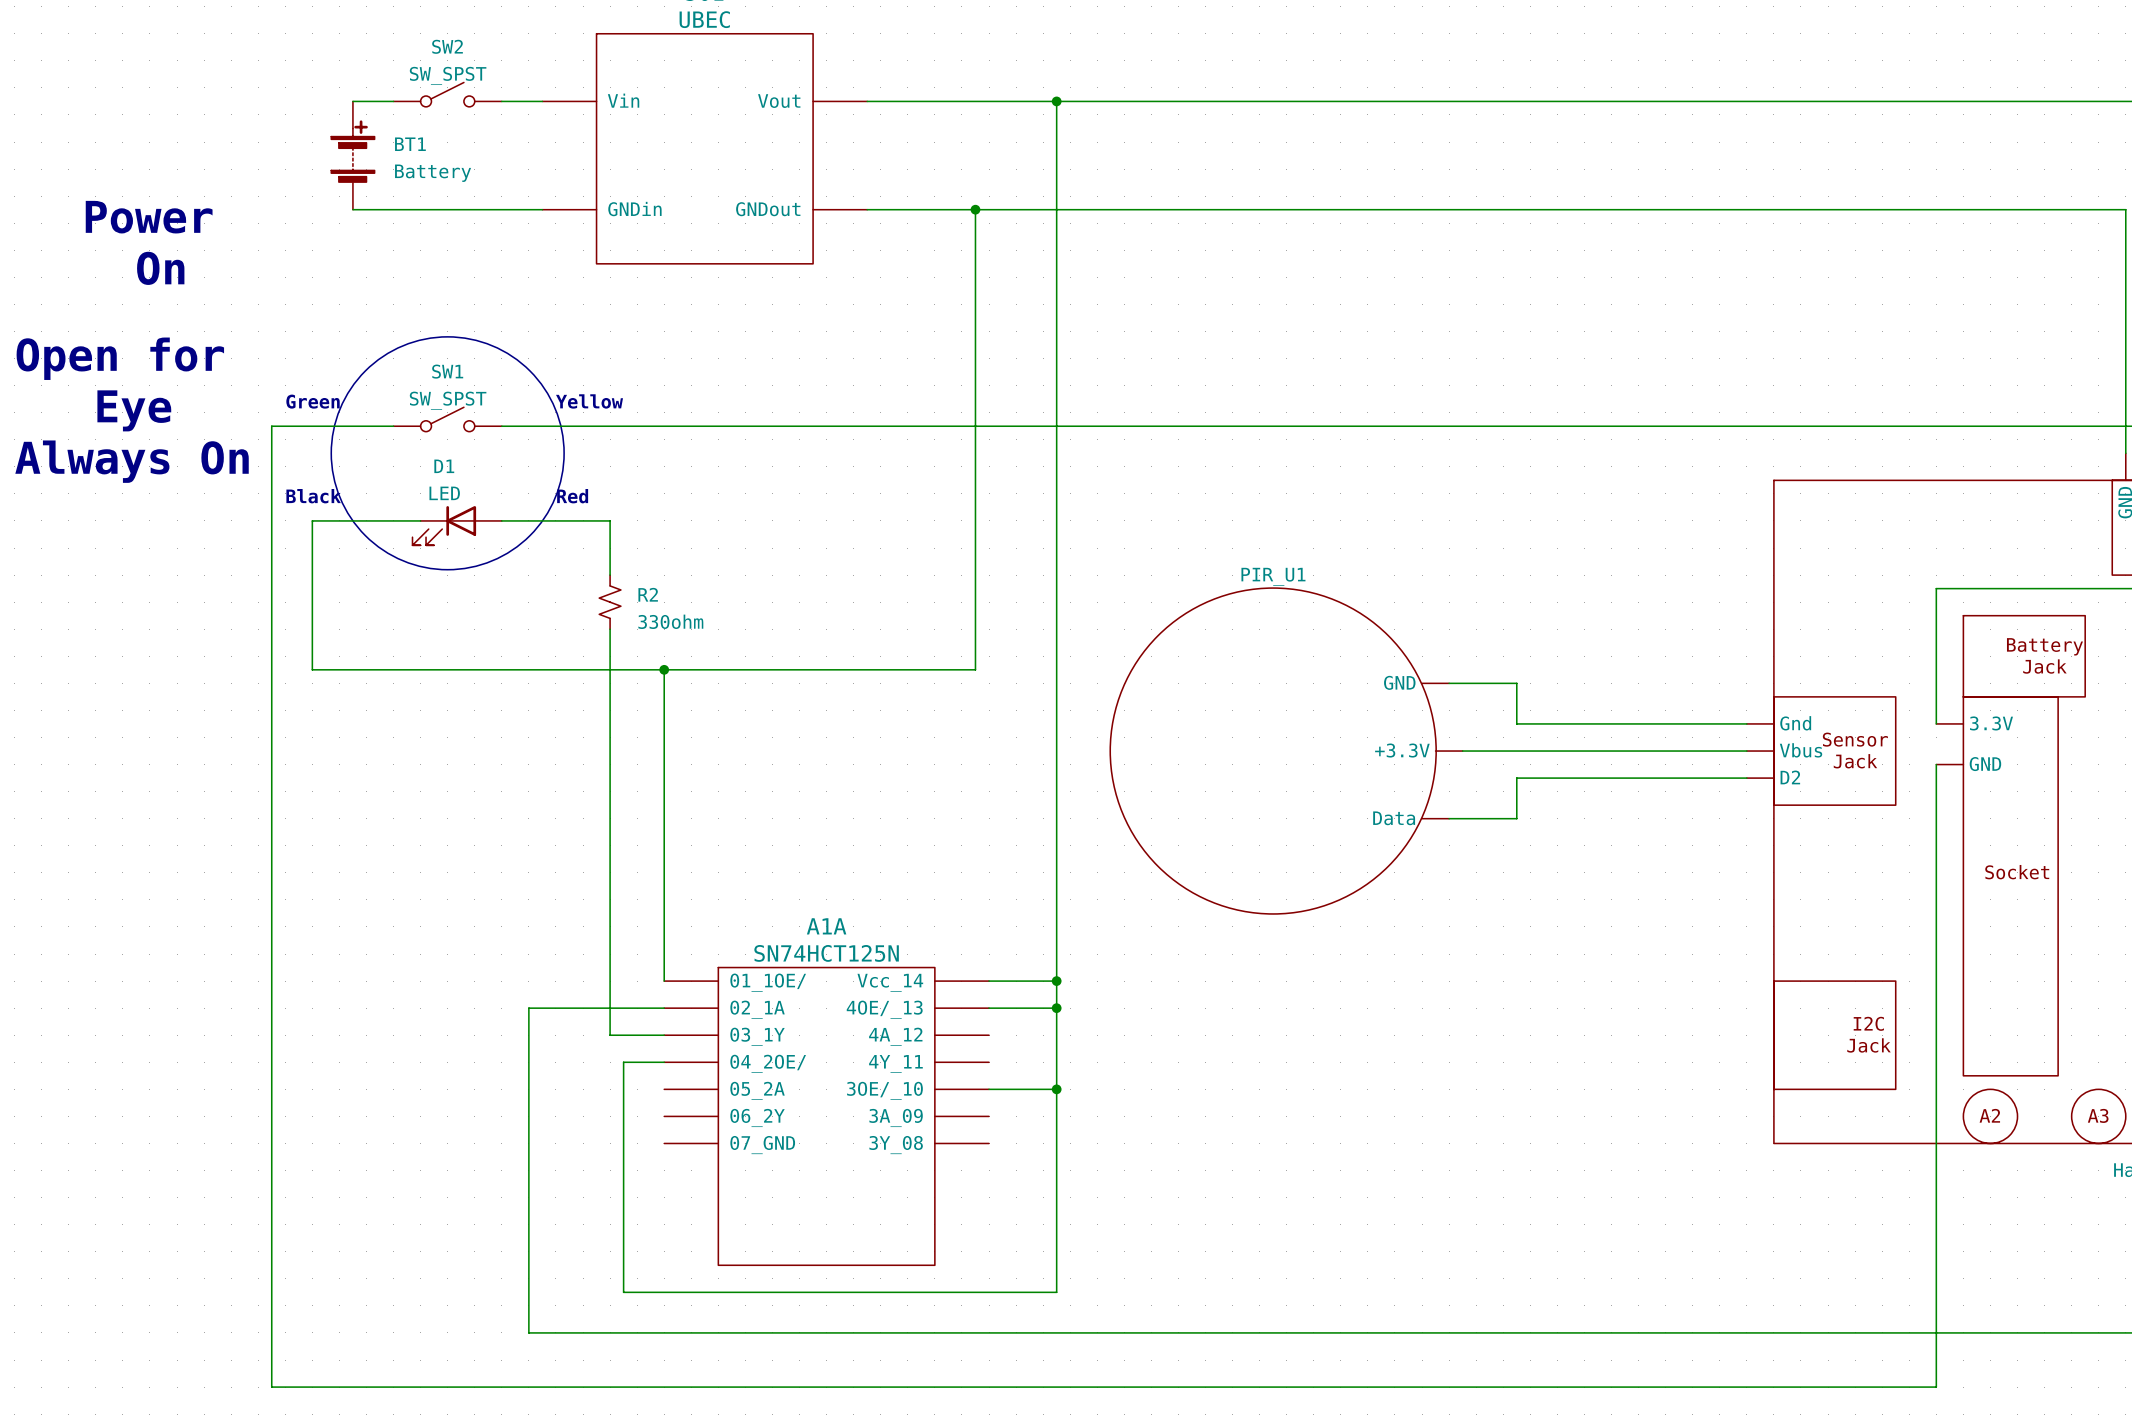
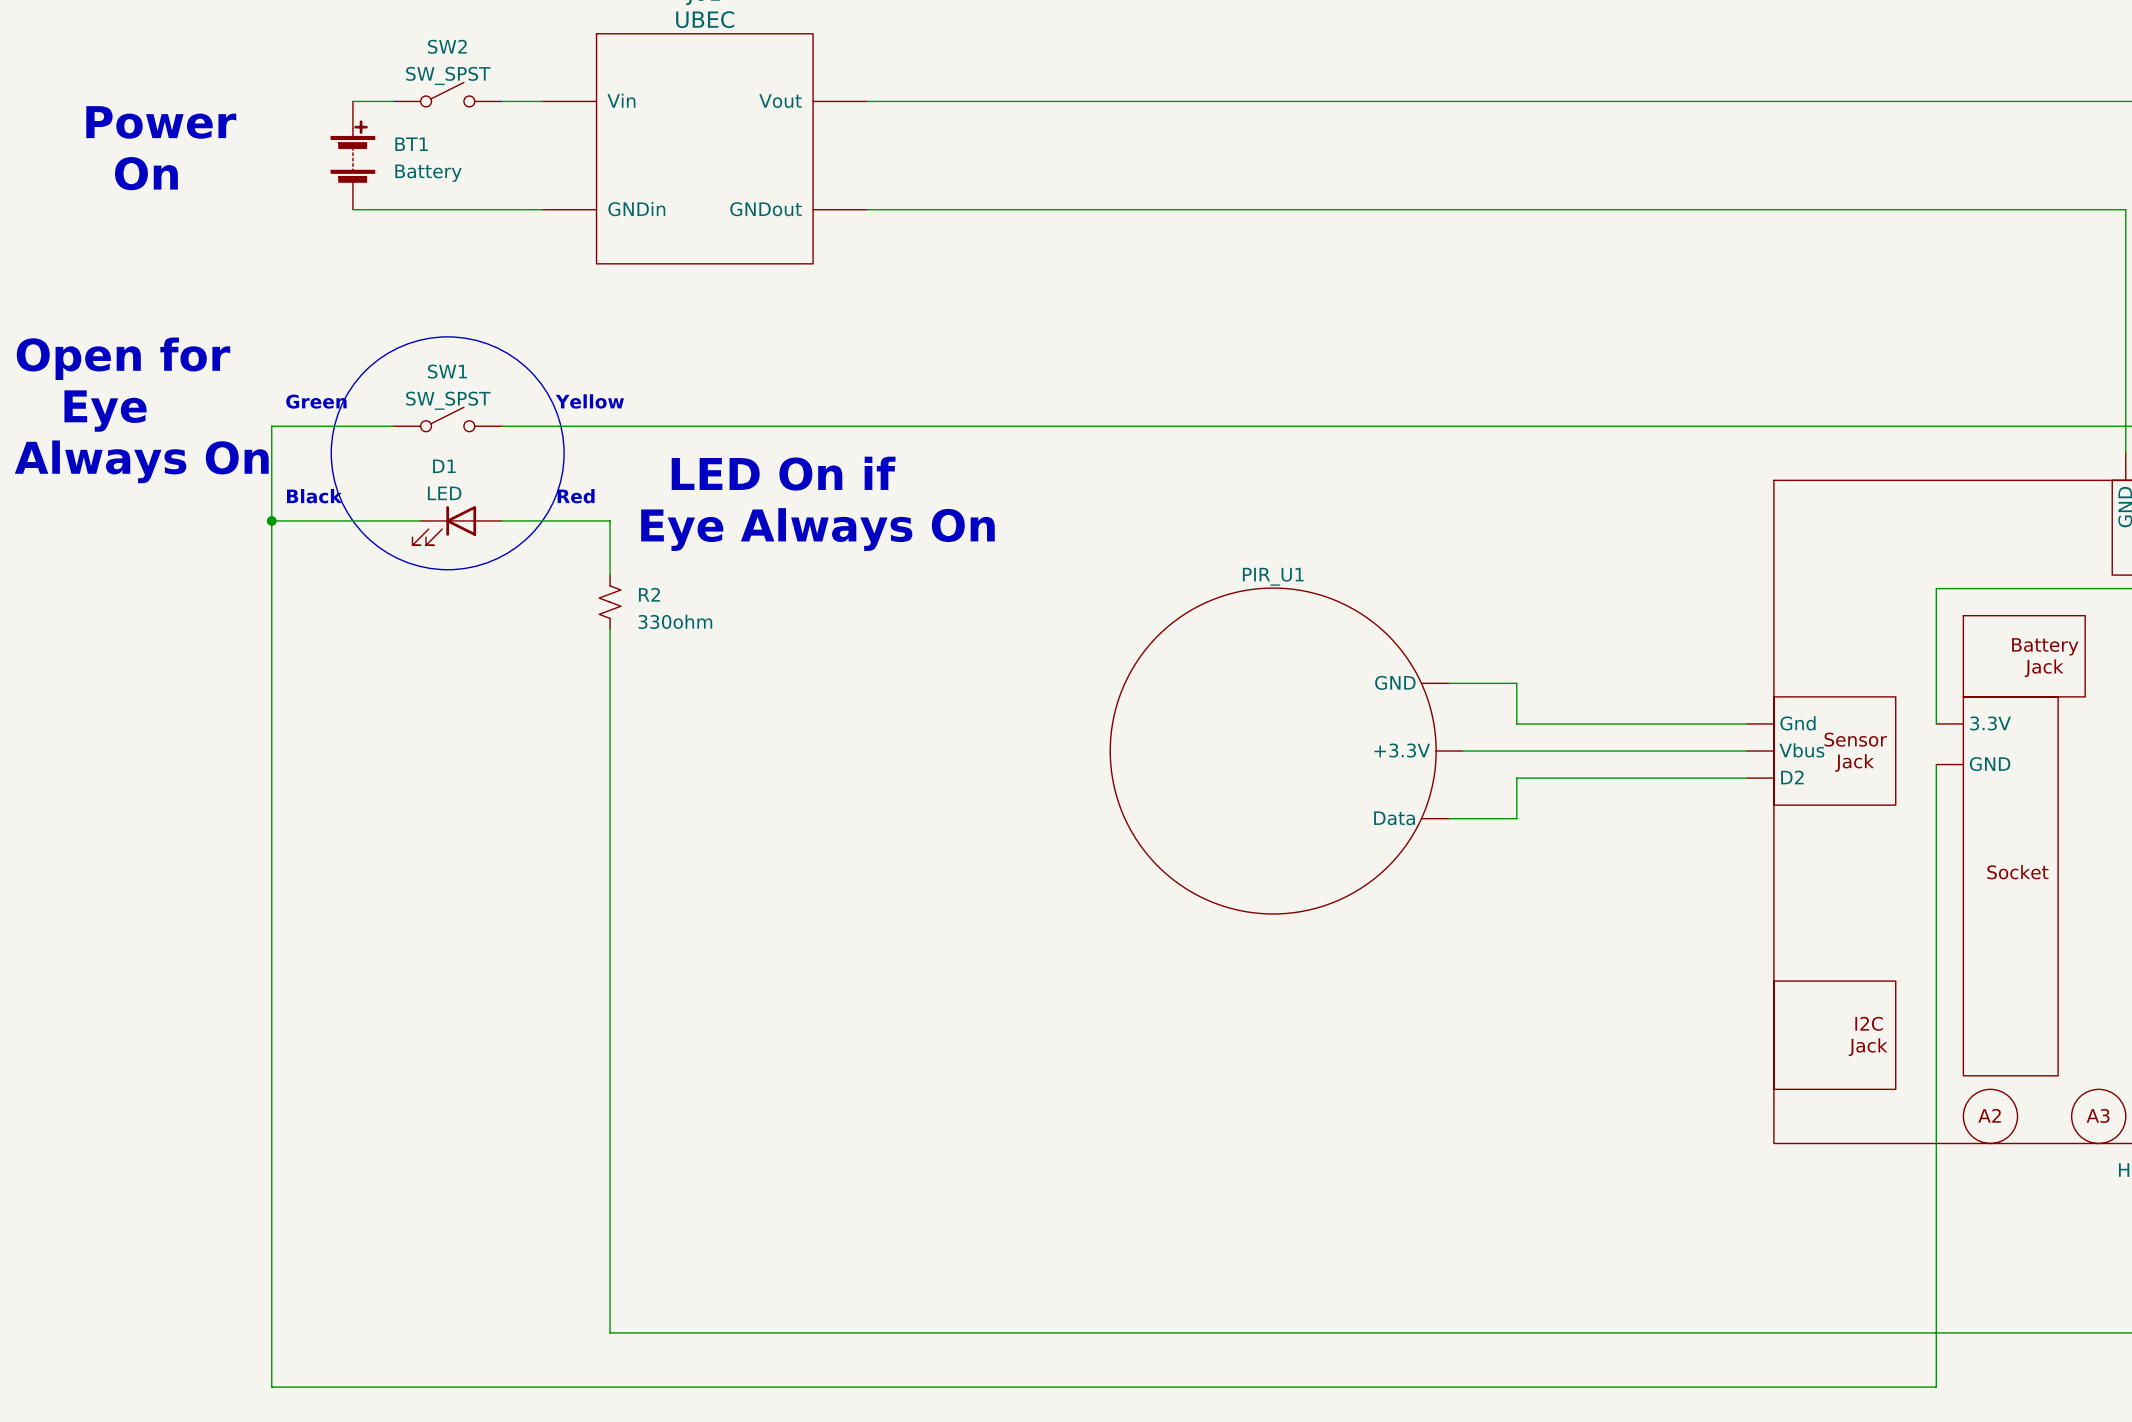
wire: (1056, 101) (1056, 1292) (623, 1292) (623, 1062) (664, 1062) -> none
junction: (1056, 101) -> none
wire: (975, 209) (975, 669) (312, 669) (312, 520) -> (271, 520) (312, 520)
junction: (975, 209) -> none
text position: Power (149, 217) -> Power (161, 122)
text position: On (160, 268) -> On (146, 173)
text: none -> LED On if (783, 473)
junction: none -> (271, 520)
text: none -> Eye Always On (817, 529)
wire: (664, 669) (664, 981) -> none
junction: (664, 669) -> none
wire: (989, 981) (1056, 981) -> none
junction: (1056, 981) -> none
wire: (664, 1008) (528, 1008) (528, 1332) (610, 1332) -> (610, 1035) (610, 1332)
wire: (989, 1008) (1056, 1008) -> none
junction: (1056, 1008) -> none
wire: (610, 1035) (664, 1035) -> none
wire: (989, 1089) (1056, 1089) -> none
junction: (1056, 1089) -> none
A1A: SN74HCT125N (826, 1116) -> none

